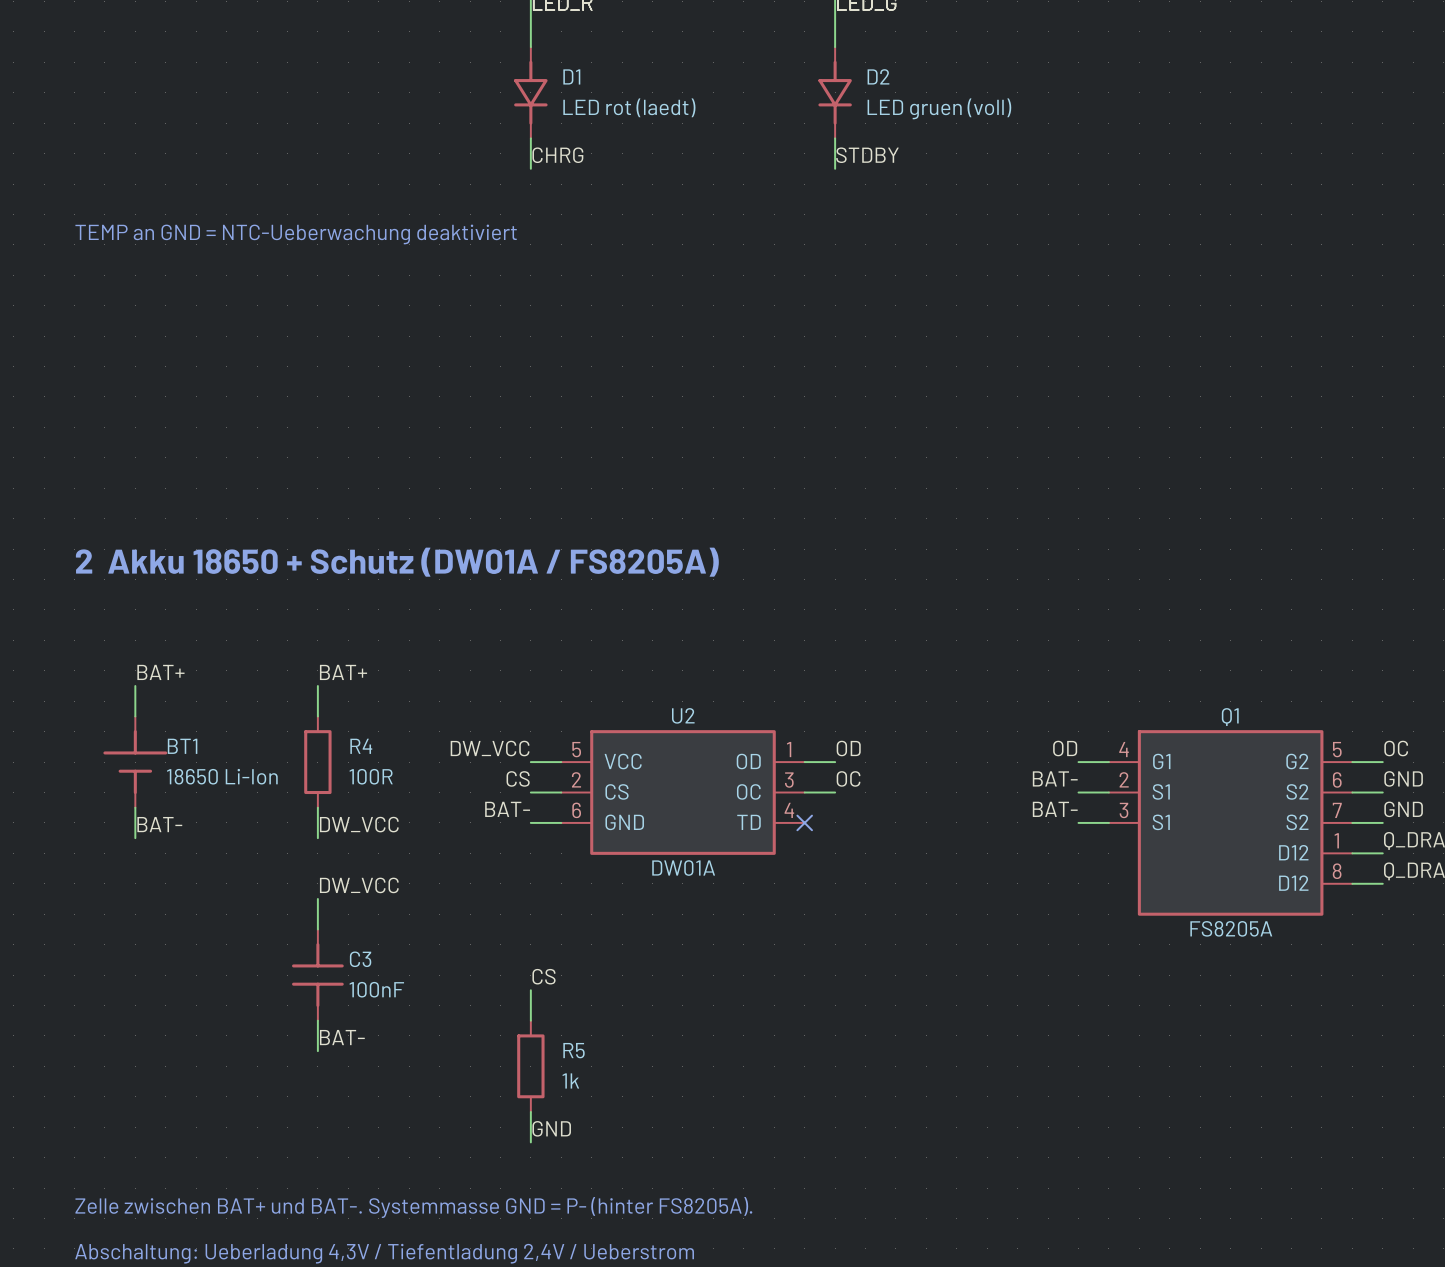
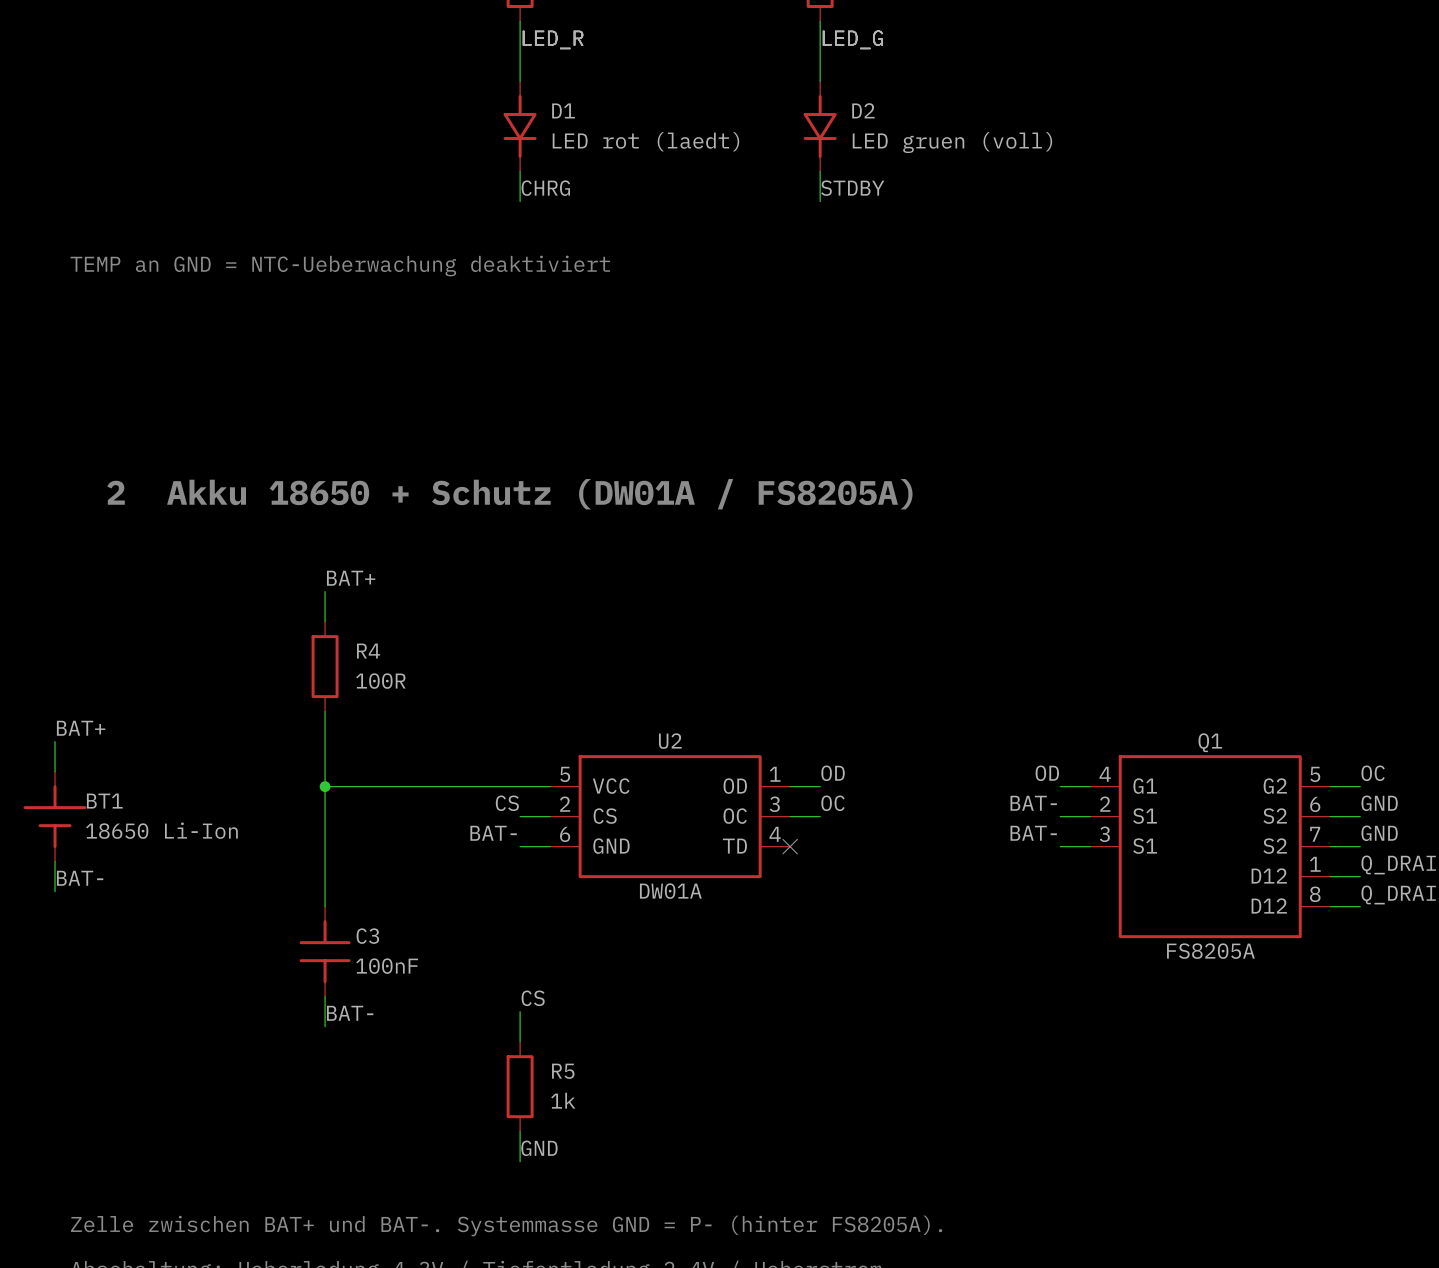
label: none -> BAT+ (351, 578)
text position: 2 Akku 18650 + Schutz (DW01A / FS8205A) (397, 562) -> 2 Akku 18650 + Schutz (DW01A / FS8205A) (509, 494)
label position: BAT+ (160, 672) -> BAT+ (81, 728)
label: BAT+ (343, 672) -> none
wire: (135, 686) (135, 716) -> (55, 741) (55, 771)
wire: (317, 686) (317, 716) -> (325, 591) (325, 621)
wire: none -> (325, 711) (325, 906)
label: DW_VCC (490, 748) -> none
BT1 position: (135, 762) -> (55, 816)
R4 position: (317, 762) -> (325, 666)
wire: none -> (325, 786) (520, 786)
junction: none -> (325, 786)
wire: (135, 807) (135, 838) -> (55, 861) (55, 891)
wire: (317, 807) (317, 838) -> none
label position: BAT- (159, 824) -> BAT- (80, 878)
label: DW_VCC (359, 824) -> none
label: DW_VCC (359, 885) -> none
wire: (317, 899) (317, 929) -> none
C3 position: (317, 975) -> (325, 951)
wire: (317, 1020) (317, 1051) -> (325, 996) (325, 1026)
label position: BAT- (342, 1037) -> BAT- (350, 1013)

